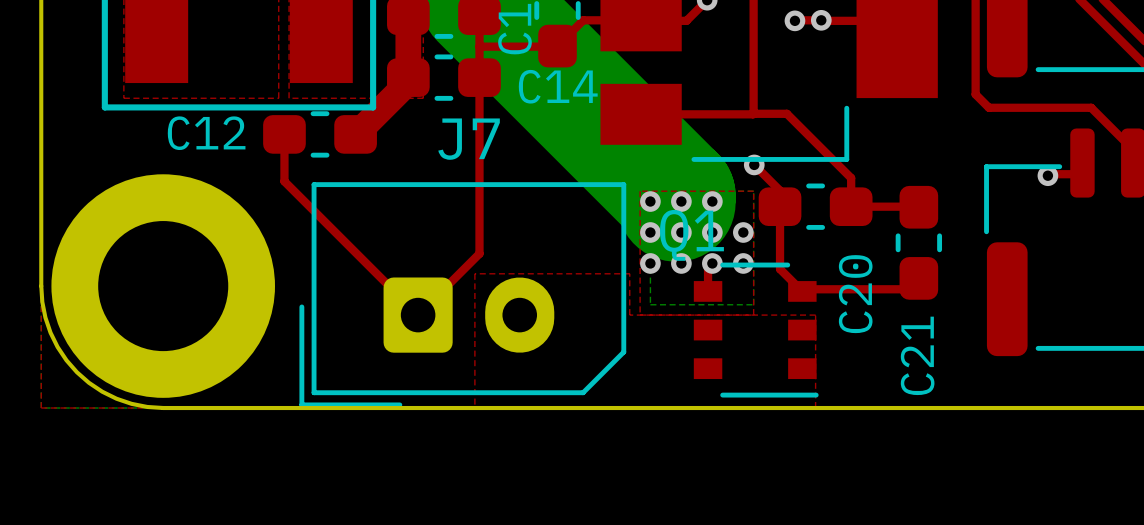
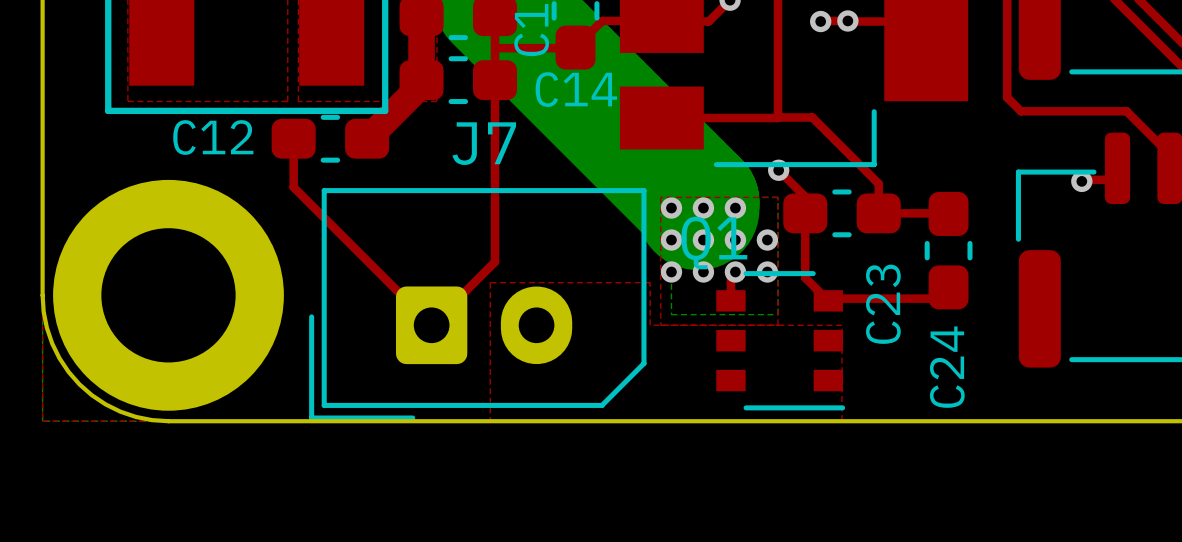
C20 name: C20 (855, 294) -> C23 (883, 304)
C21 name: C21 (917, 355) -> C24 (947, 367)

